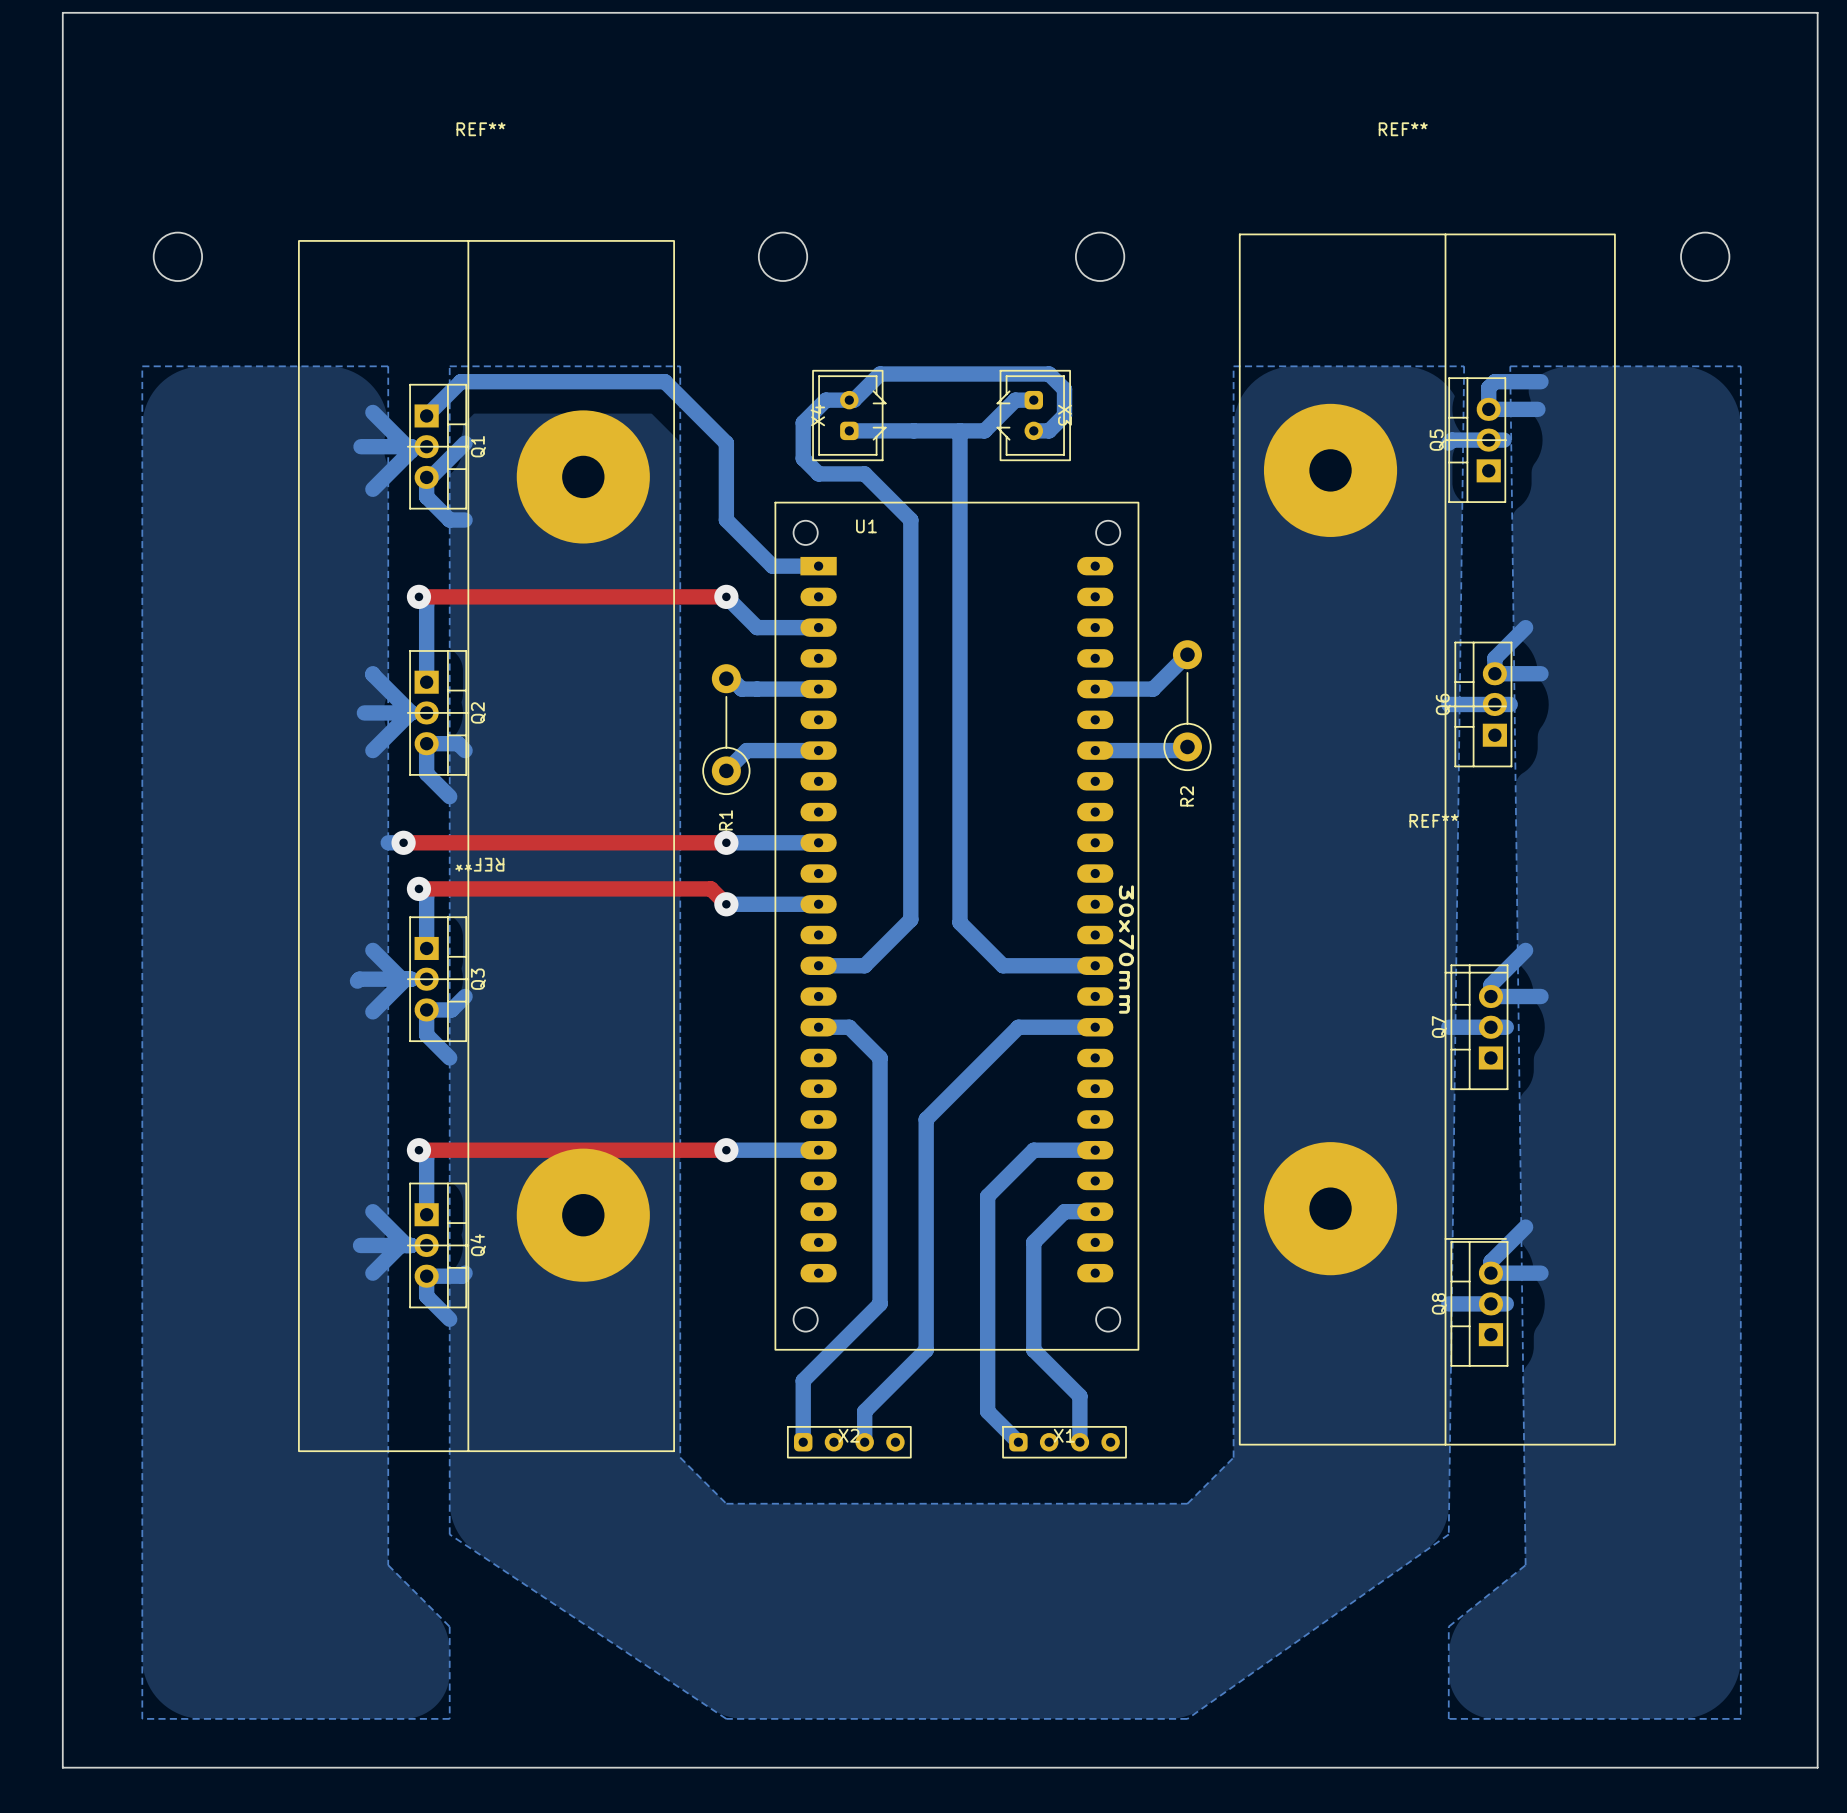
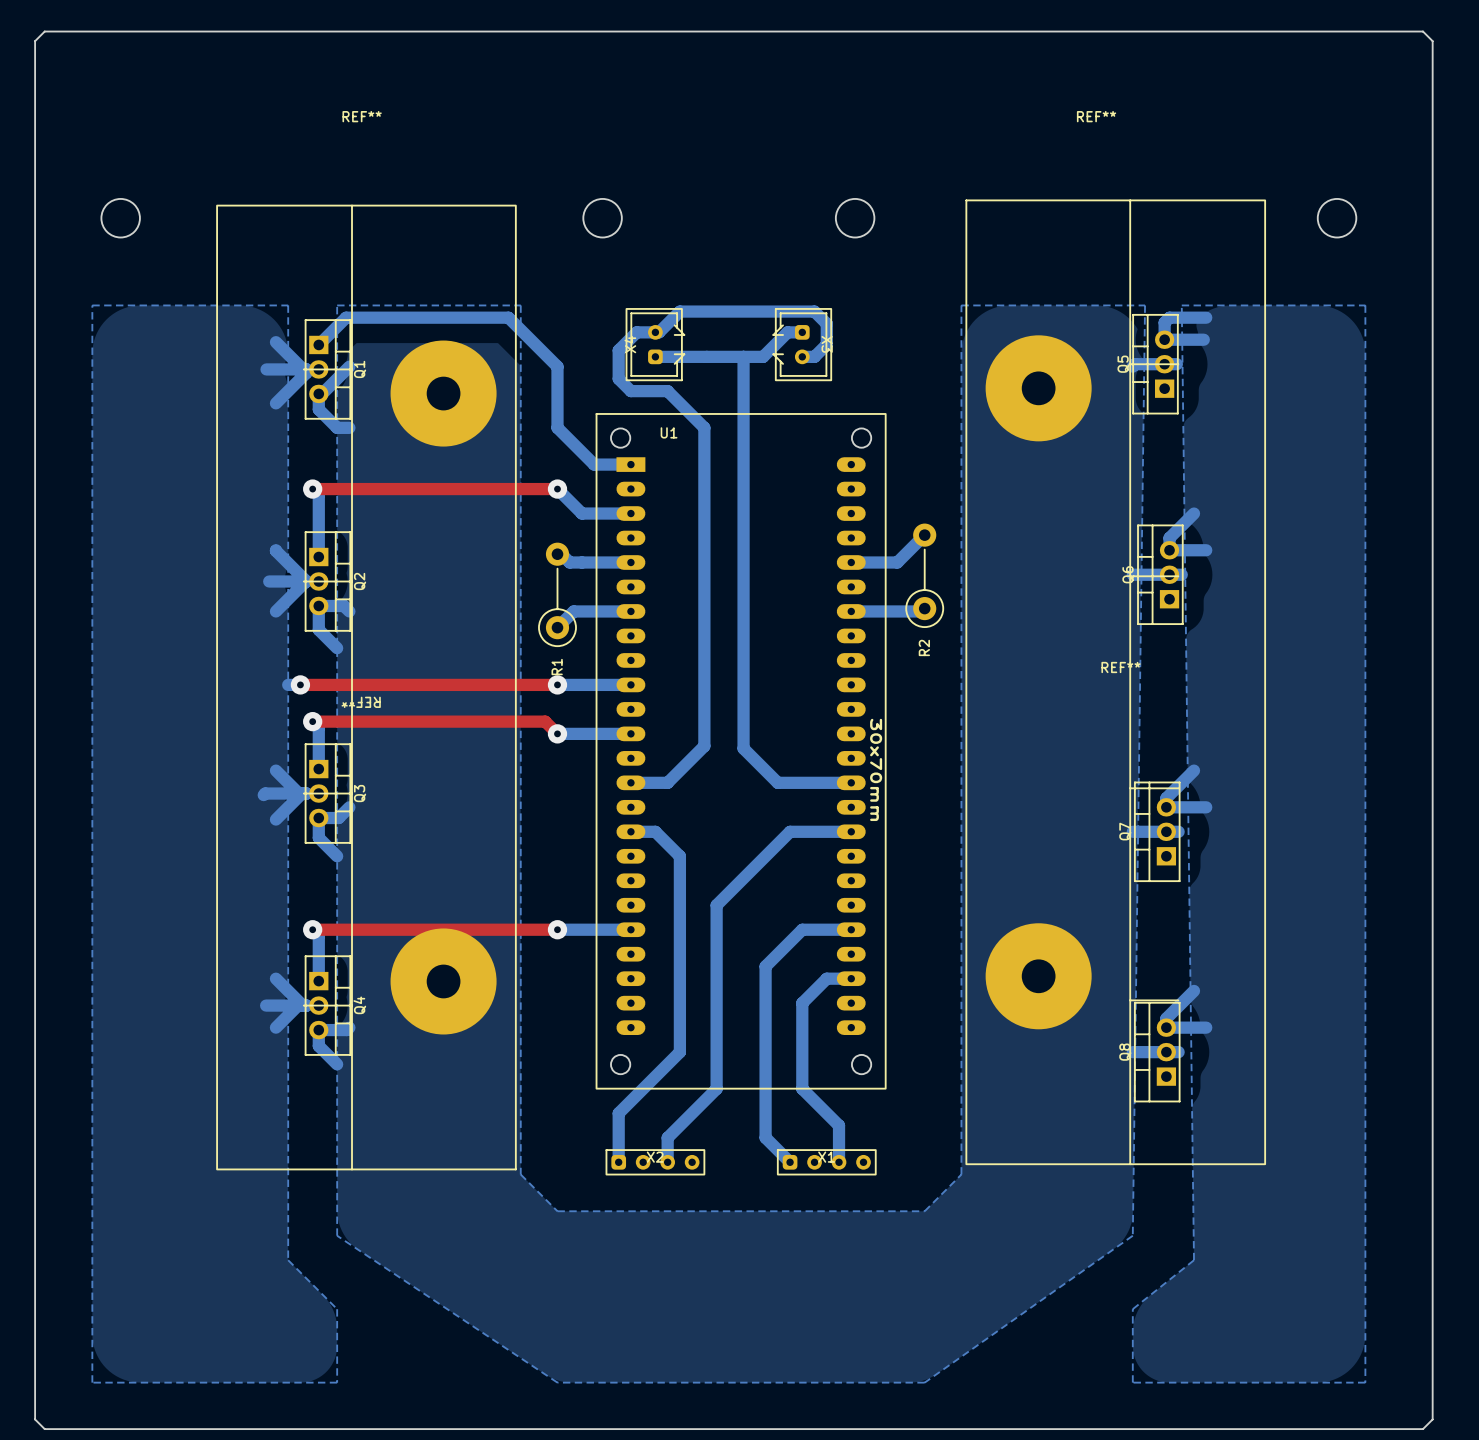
board edge: (62, 12) (1817, 12) (1817, 1767) (62, 1767) (62, 12) -> (44, 31) (35, 41) (35, 1419) (44, 1429) (1423, 1429) (1432, 1419) (1432, 41) (1423, 31) (44, 31)

